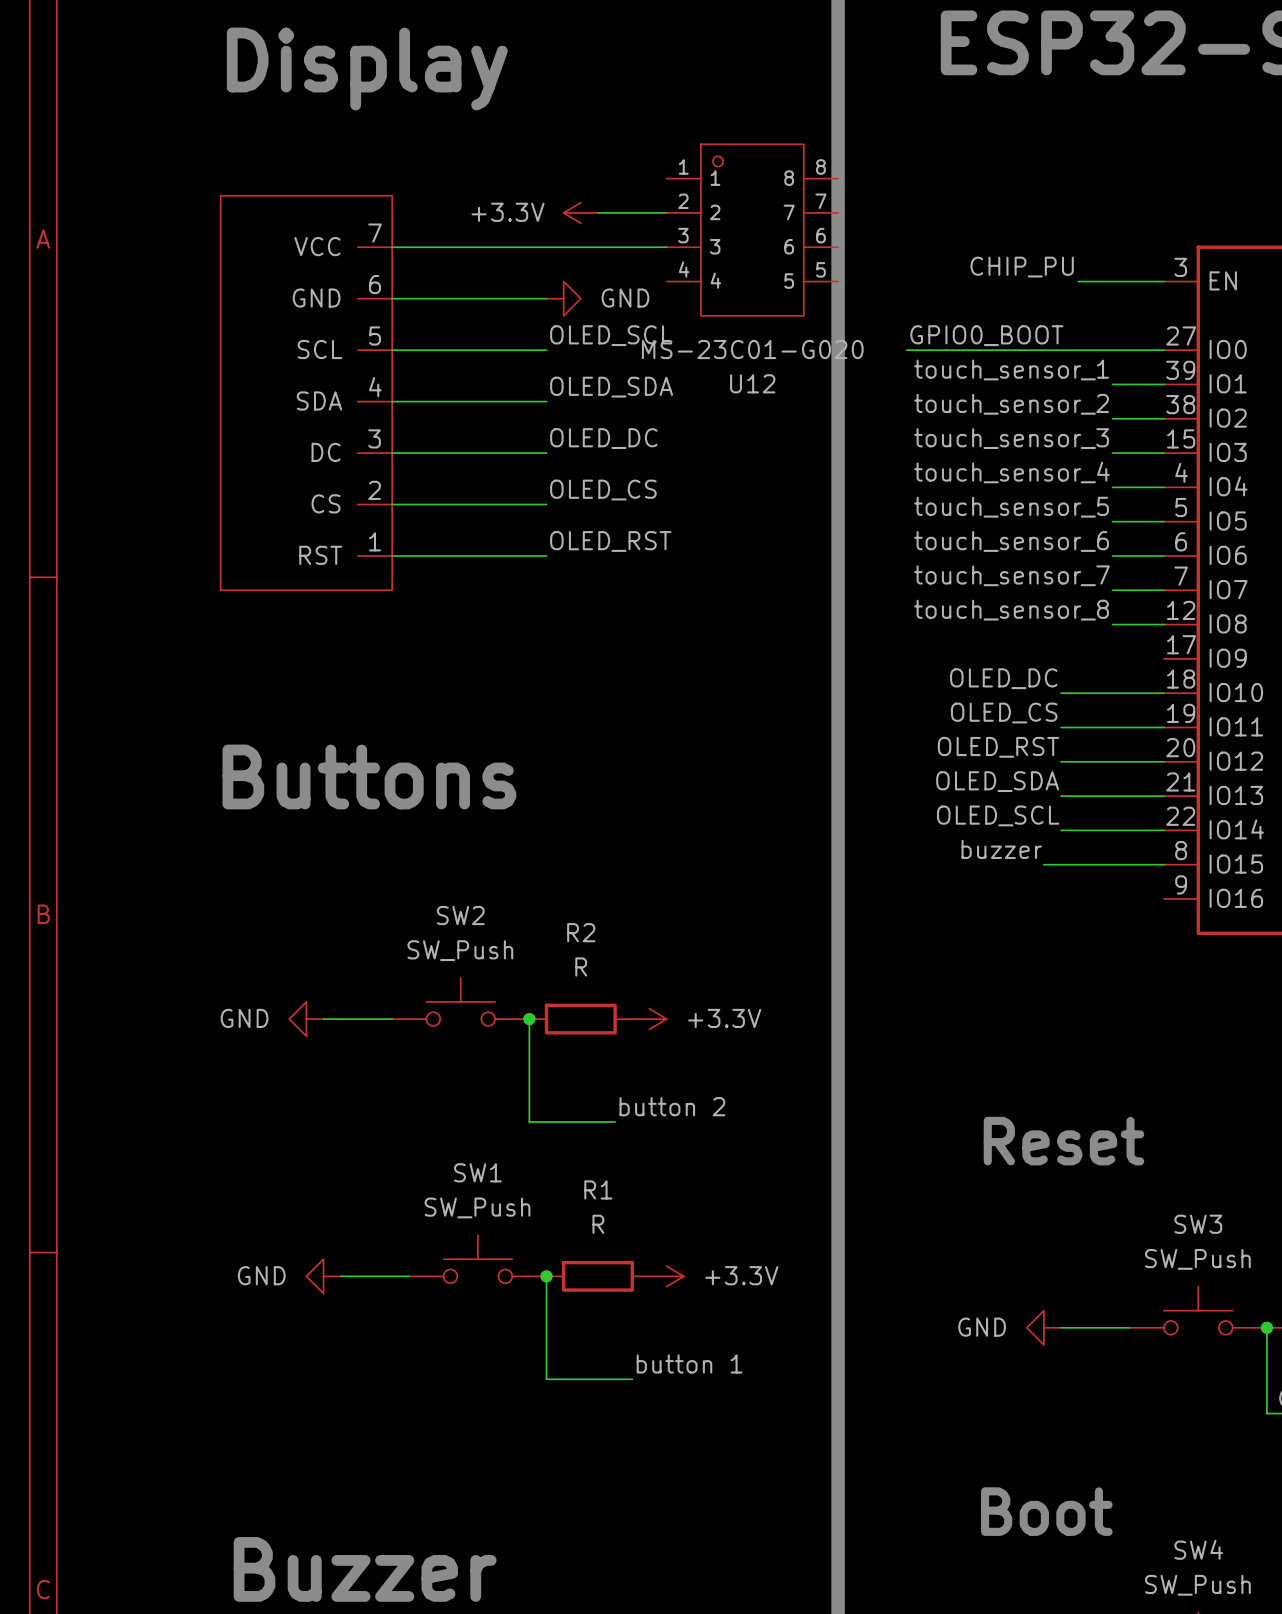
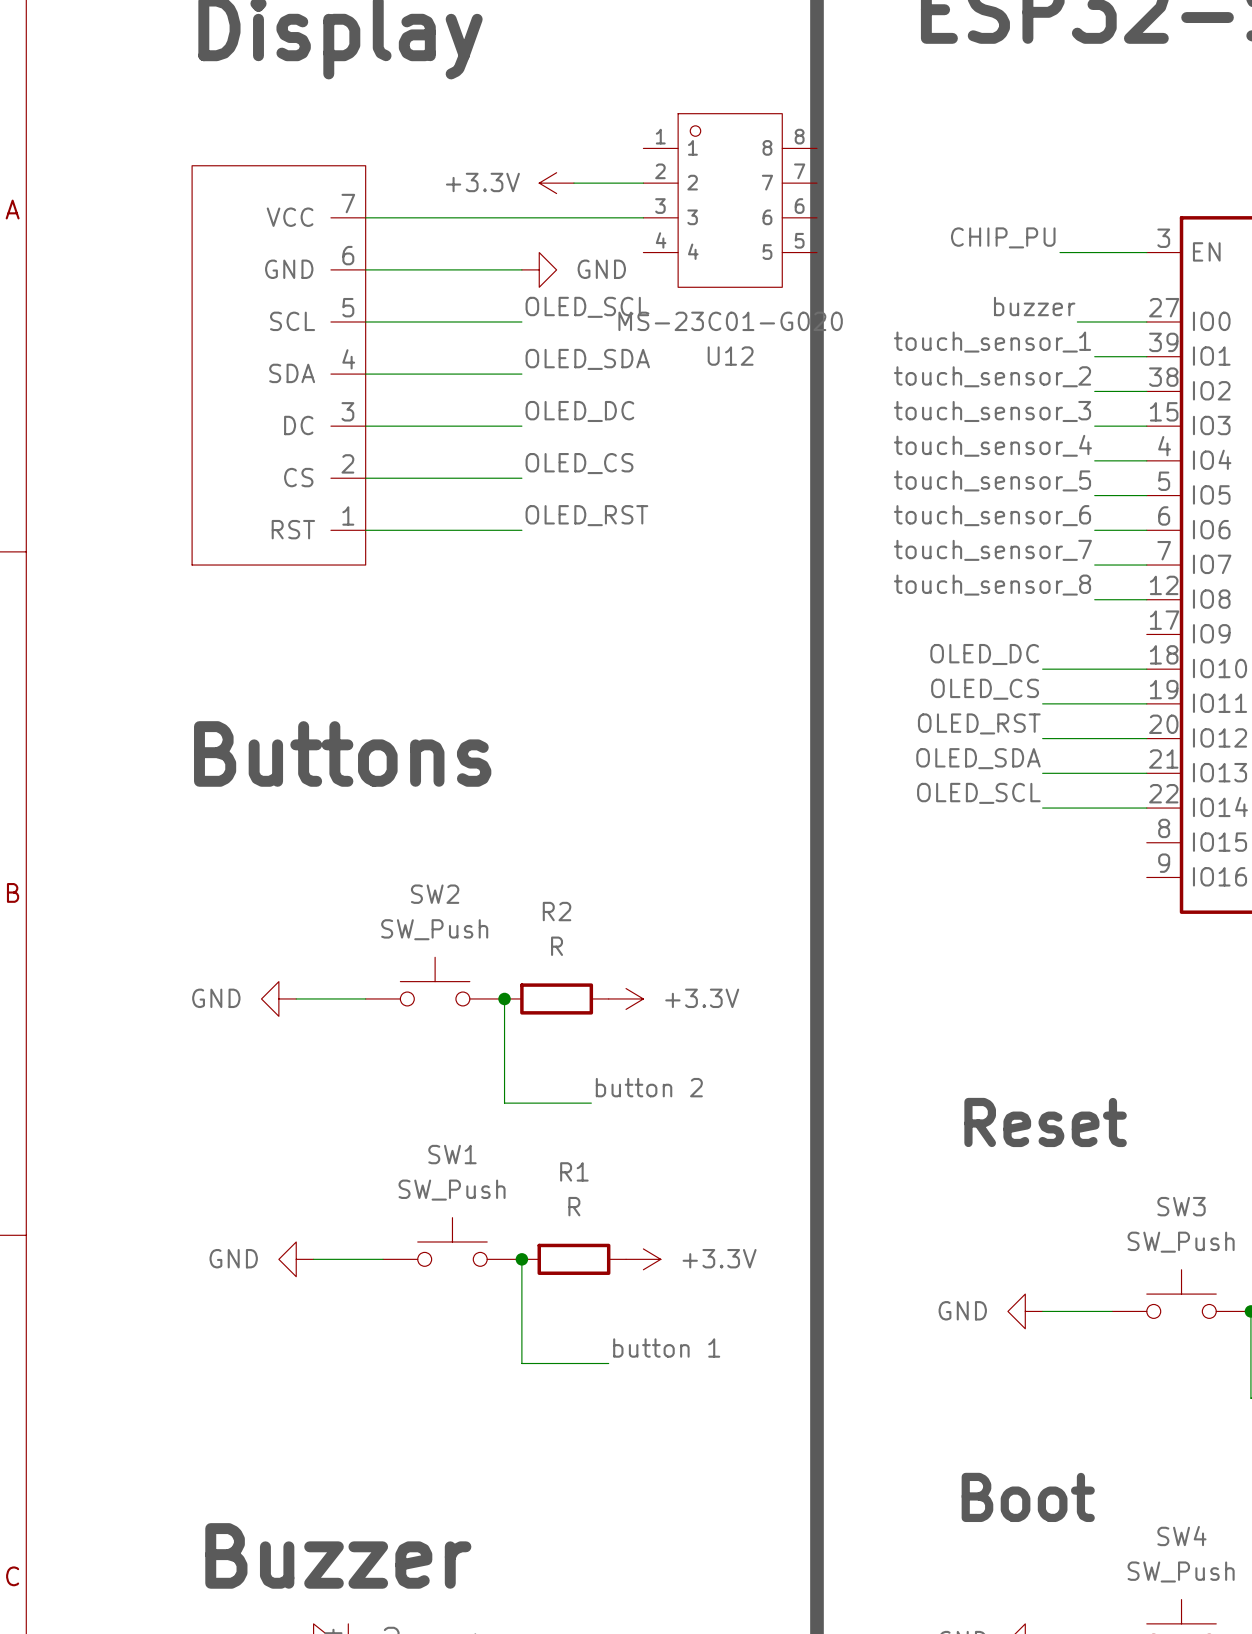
label: none -> buzzer (1034, 306)
label: GPIO0_BOOT (986, 335) -> none
wire: (906, 350) (1095, 350) -> none
label: buzzer (1001, 849) -> none
wire: (1043, 864) (1163, 864) -> none

